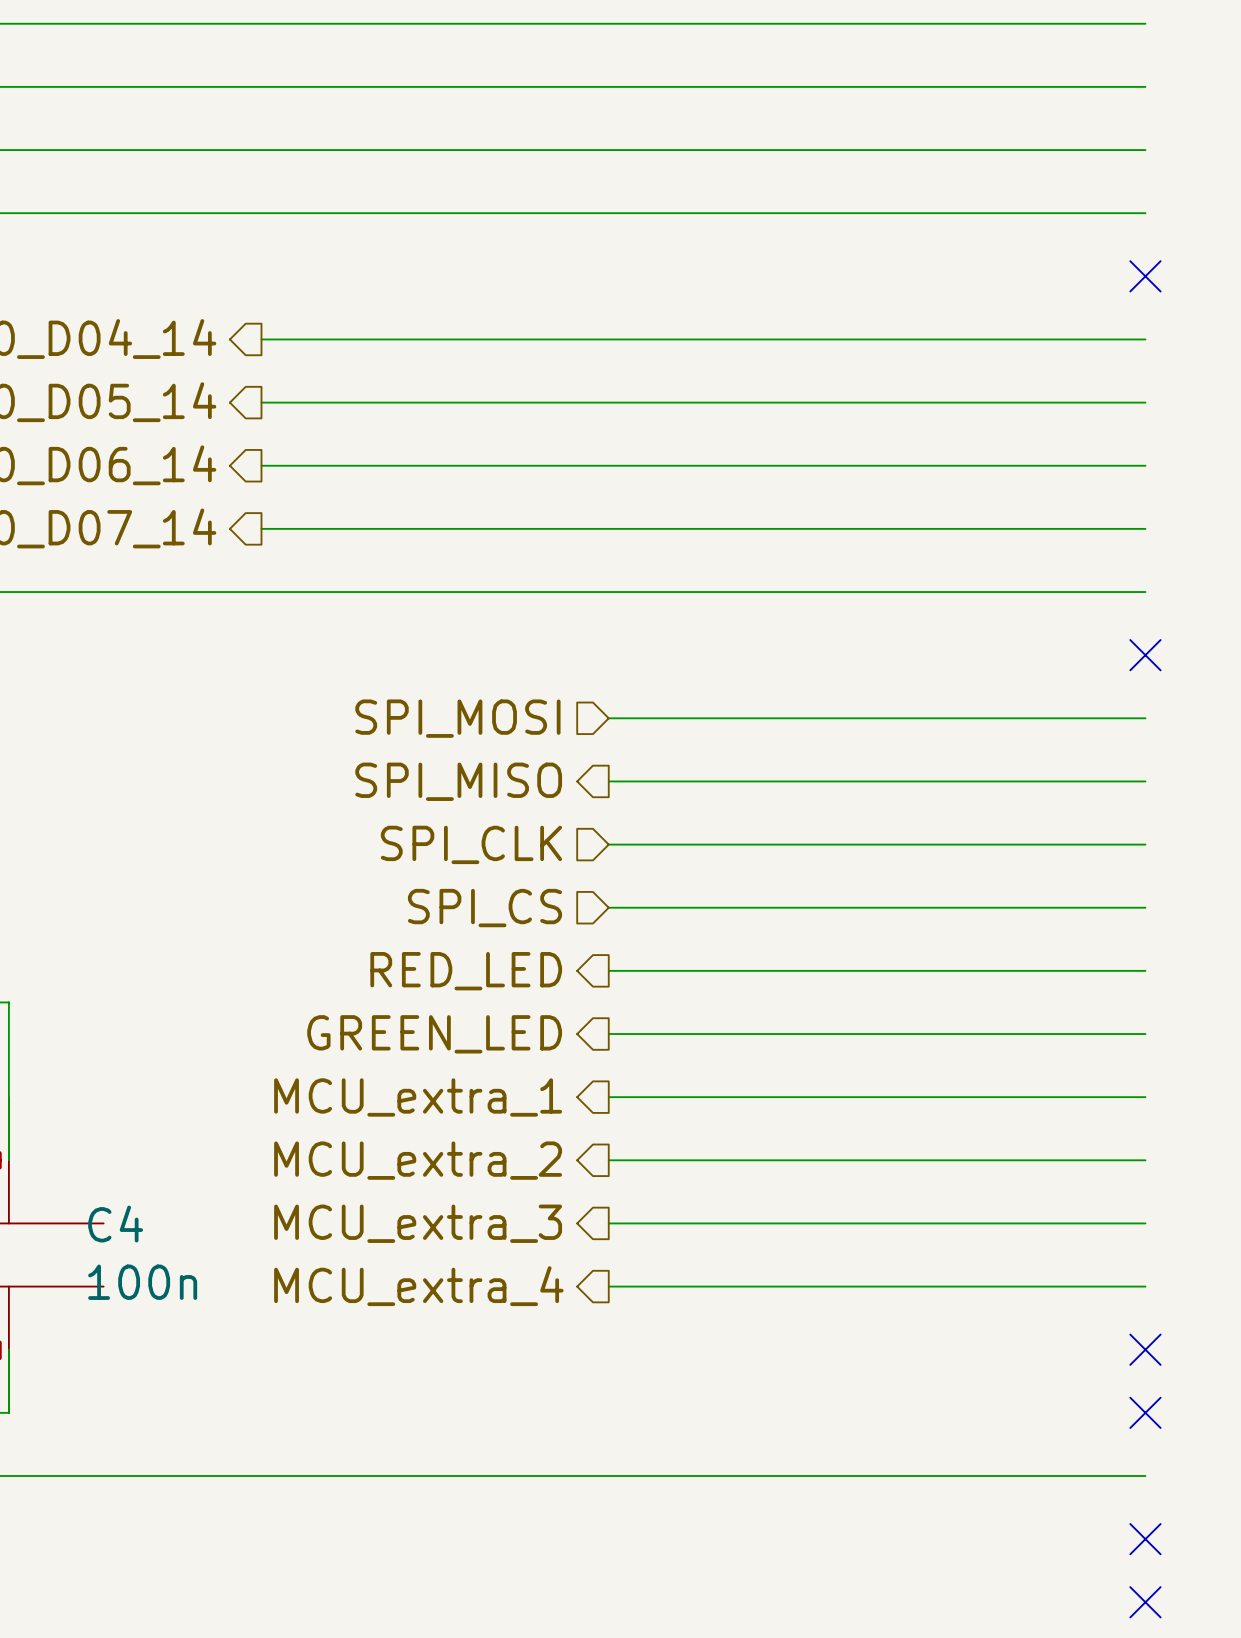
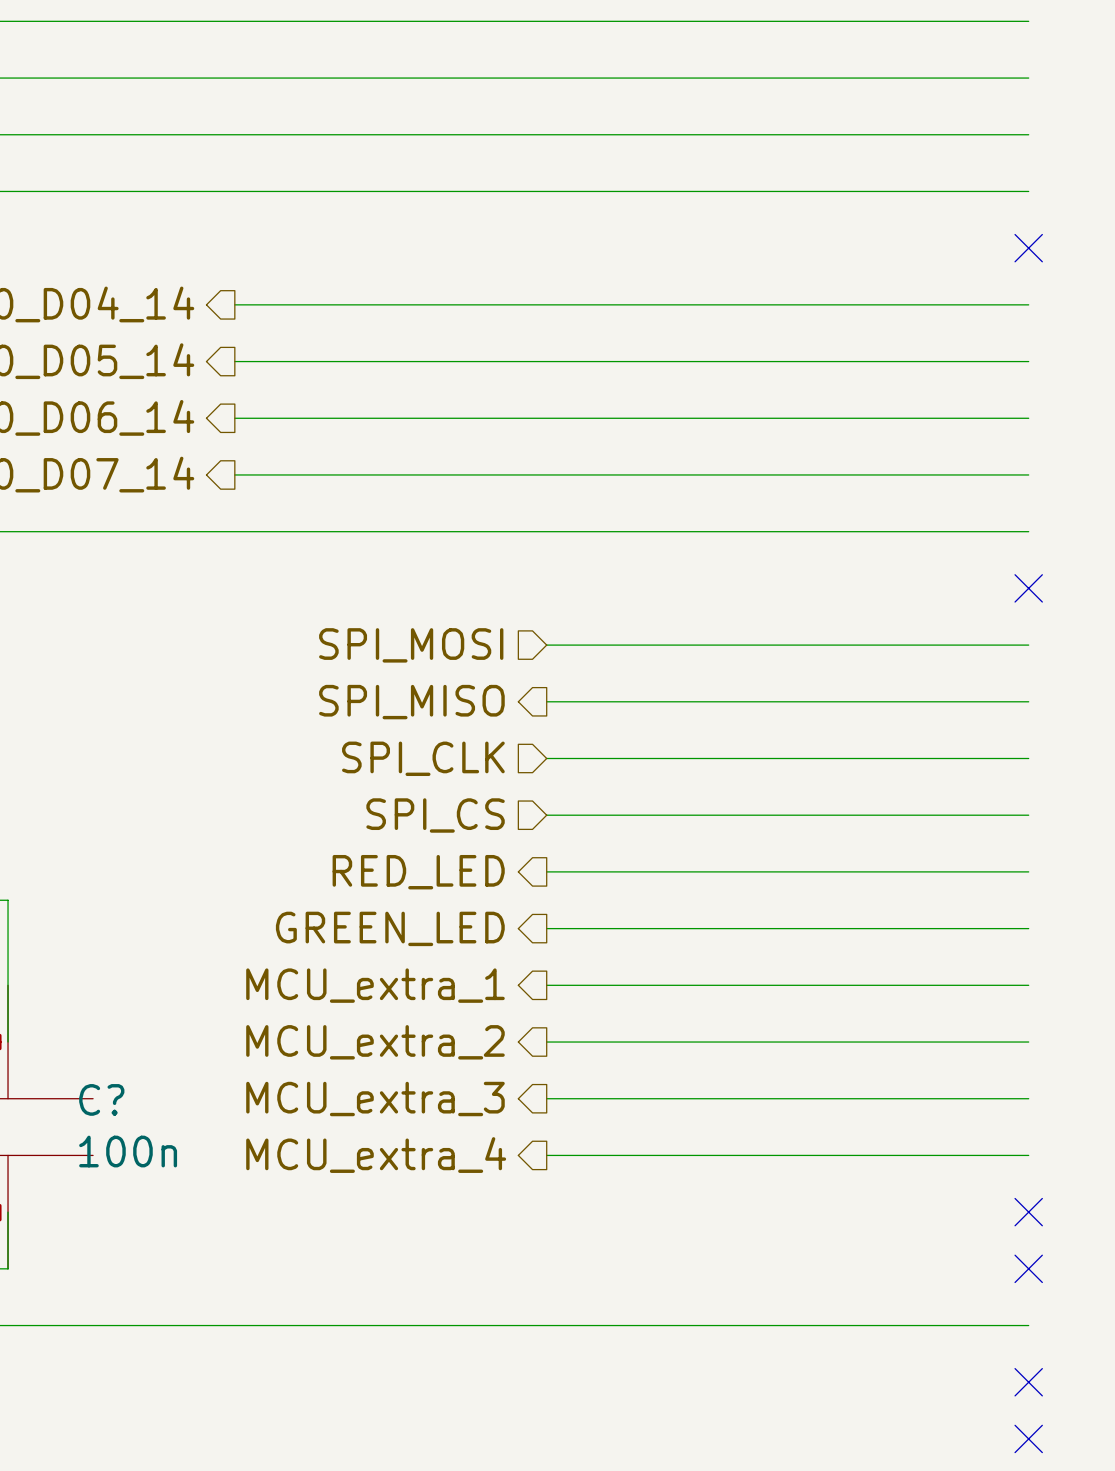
C4 name: C4 (115, 1224) -> C? (101, 1099)

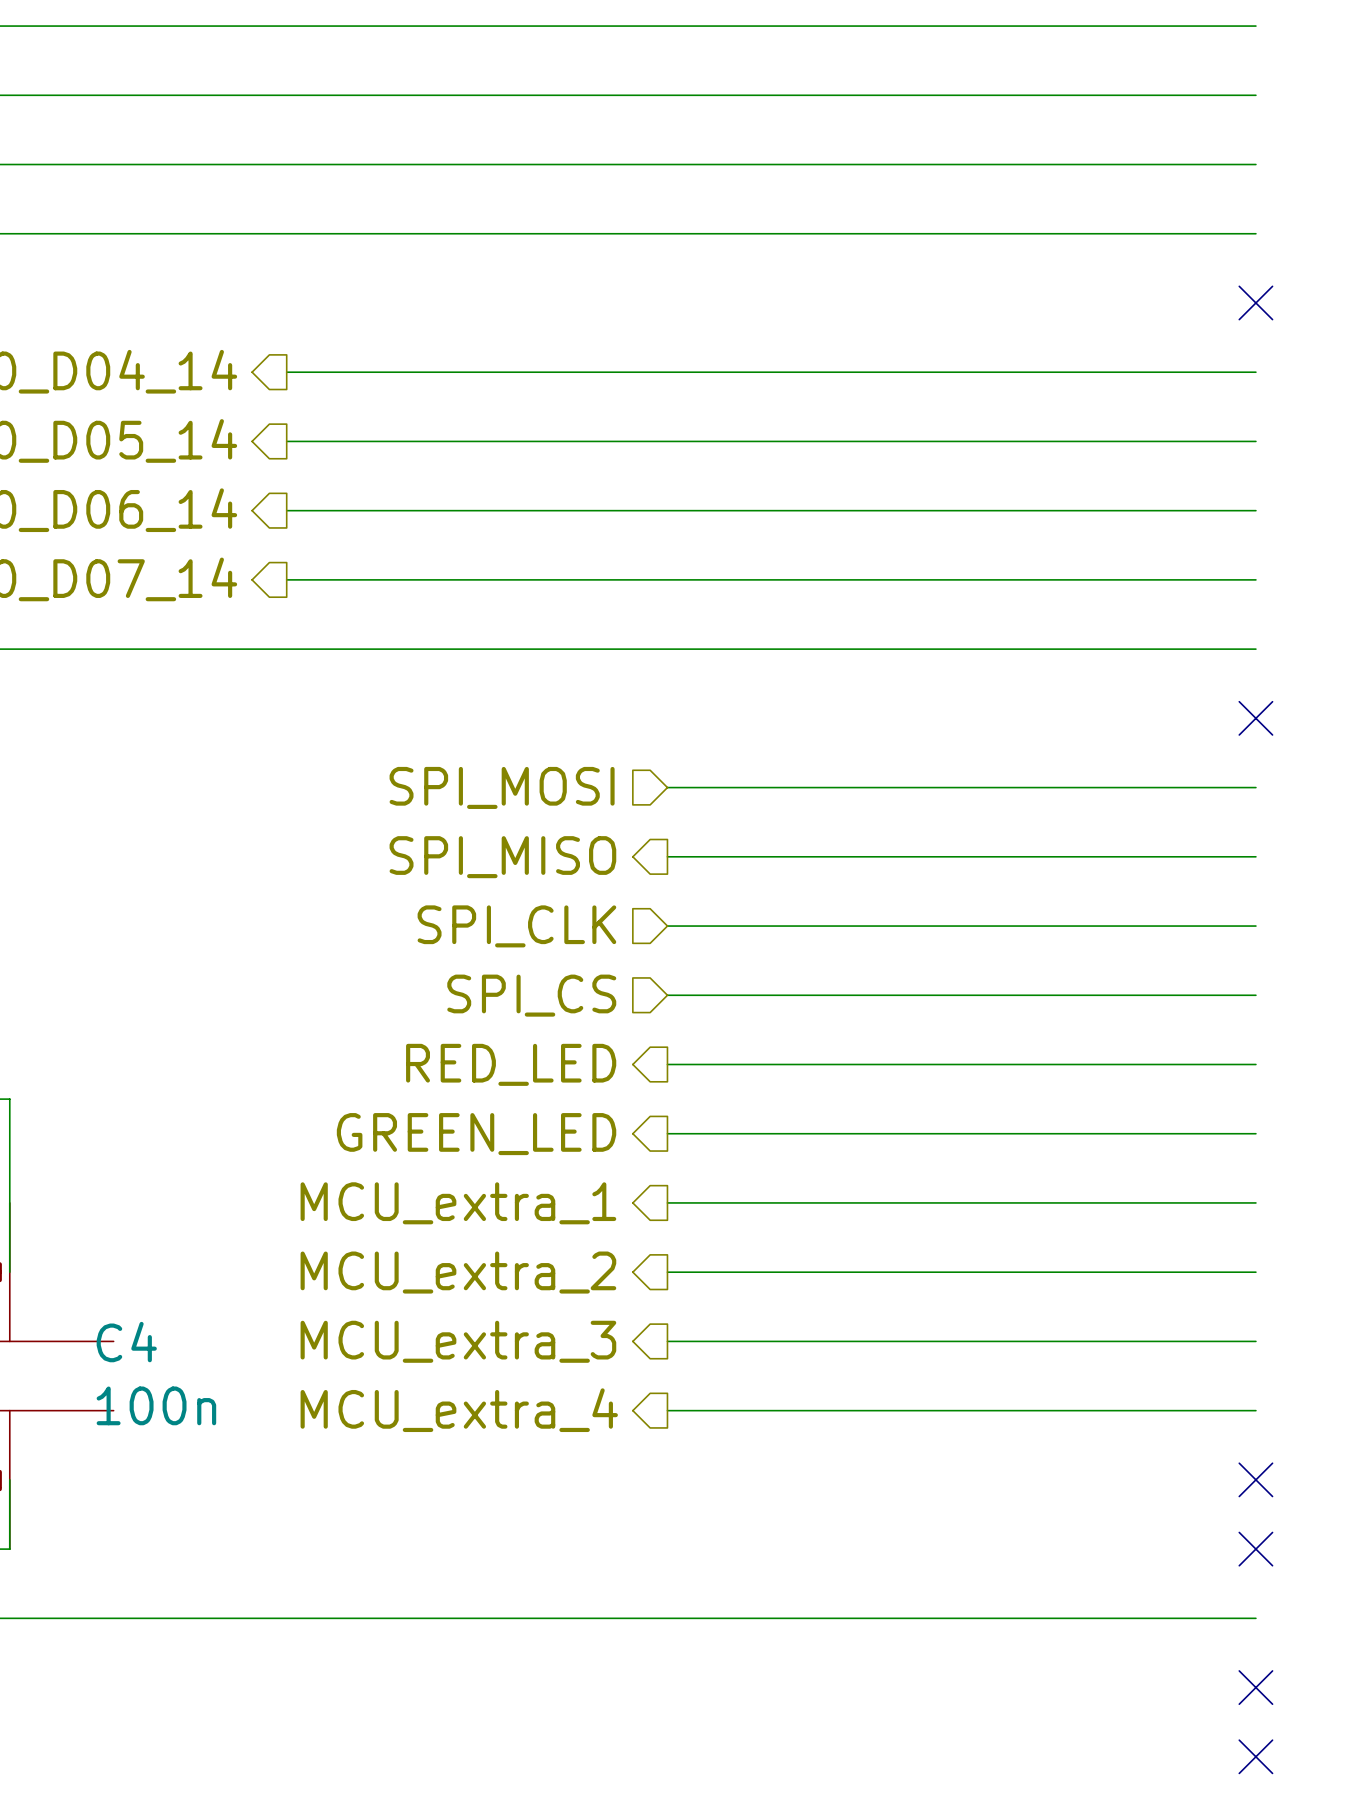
C? name: C? (101, 1099) -> C4 (126, 1342)

